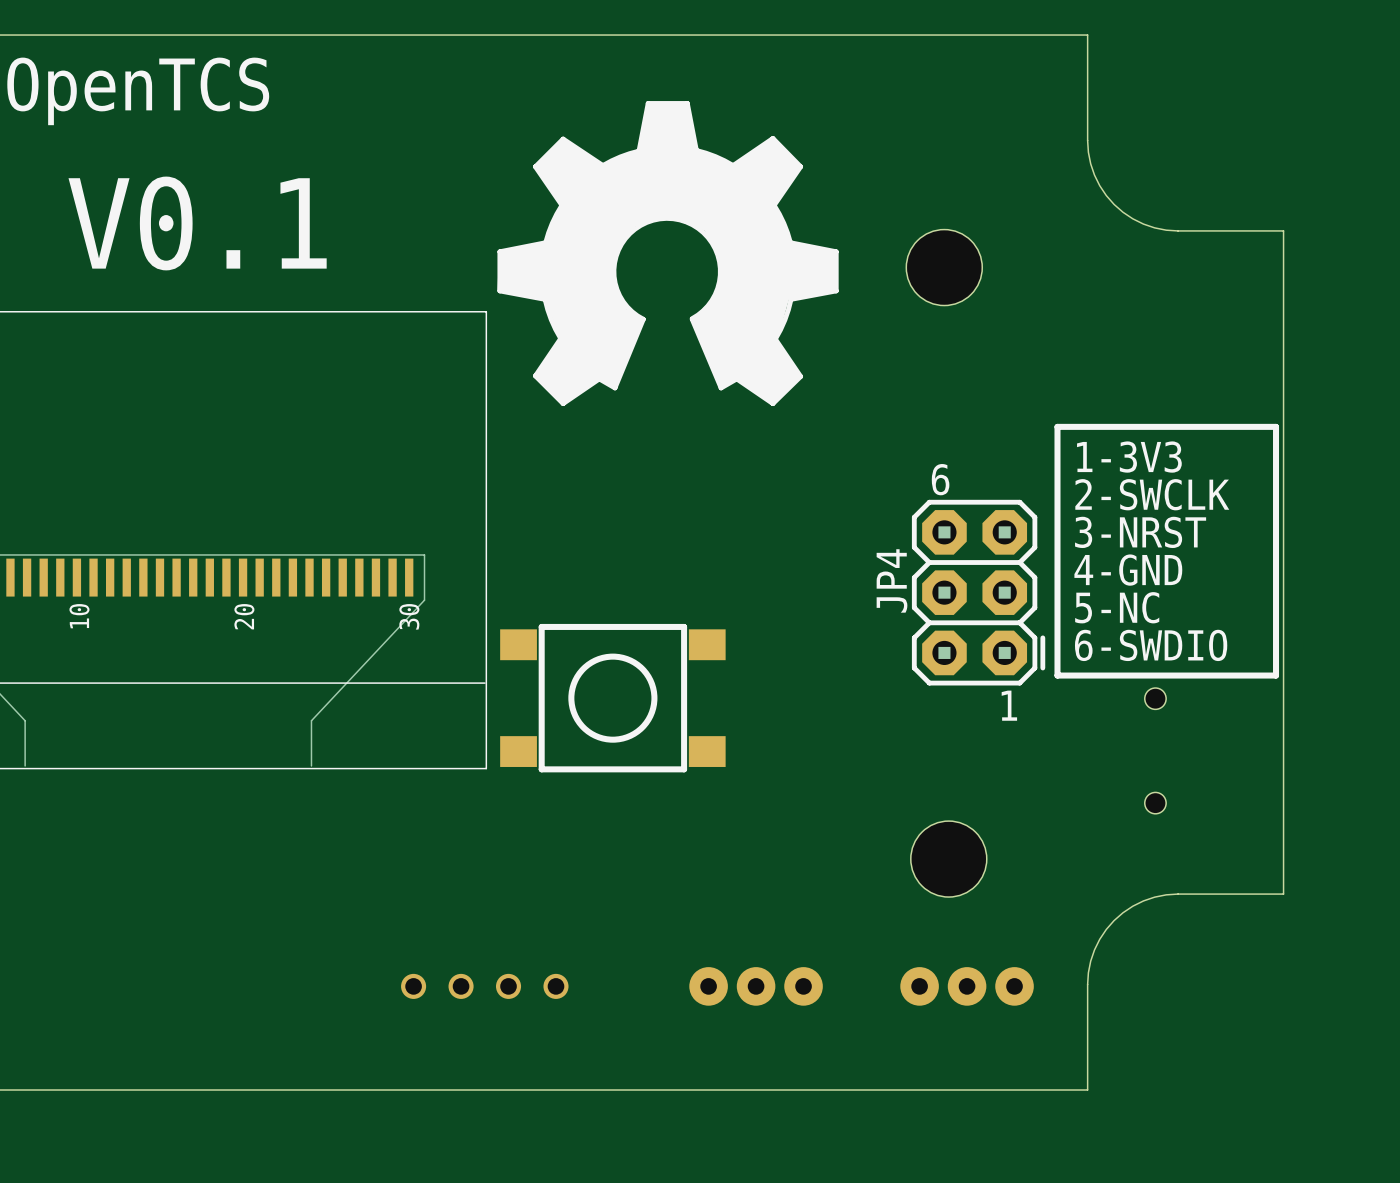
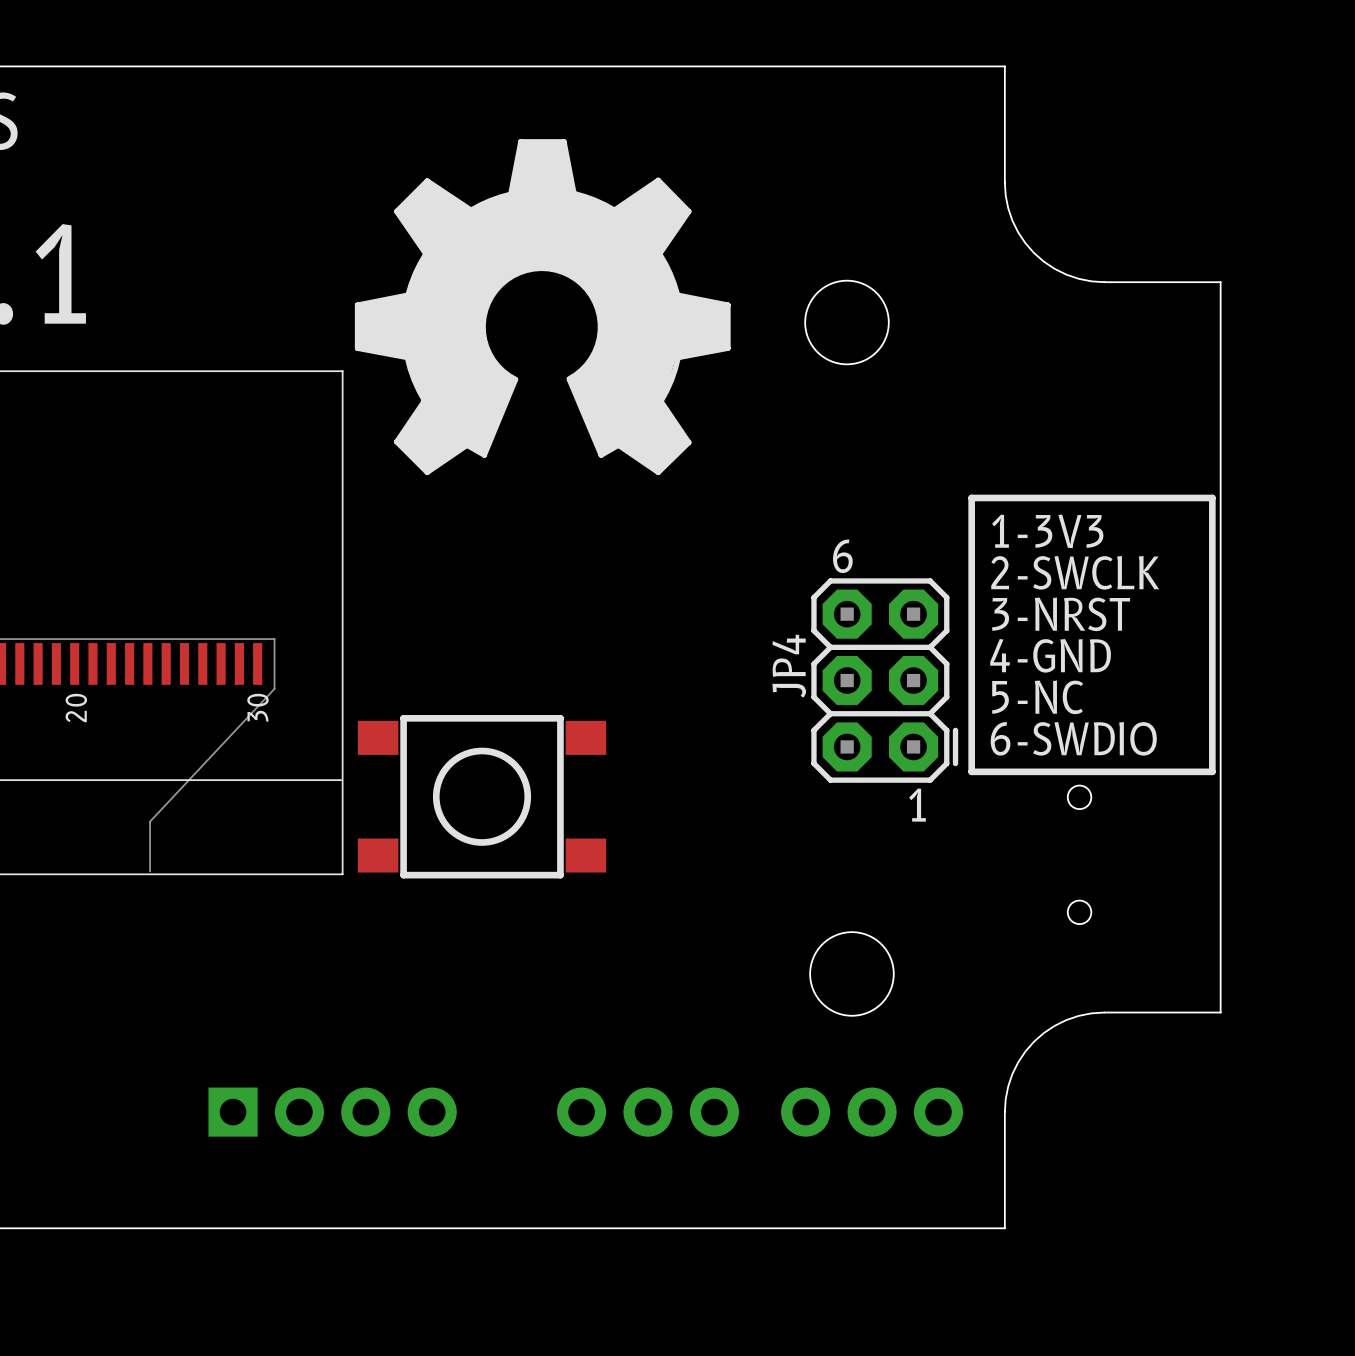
part footprint: [689, 967, 823, 1006] -> [557, 1087, 739, 1137]
part footprint: [900, 967, 1034, 1006] -> [781, 1087, 964, 1137]
part footprint: [401, 973, 569, 999] -> [208, 1087, 457, 1137]

